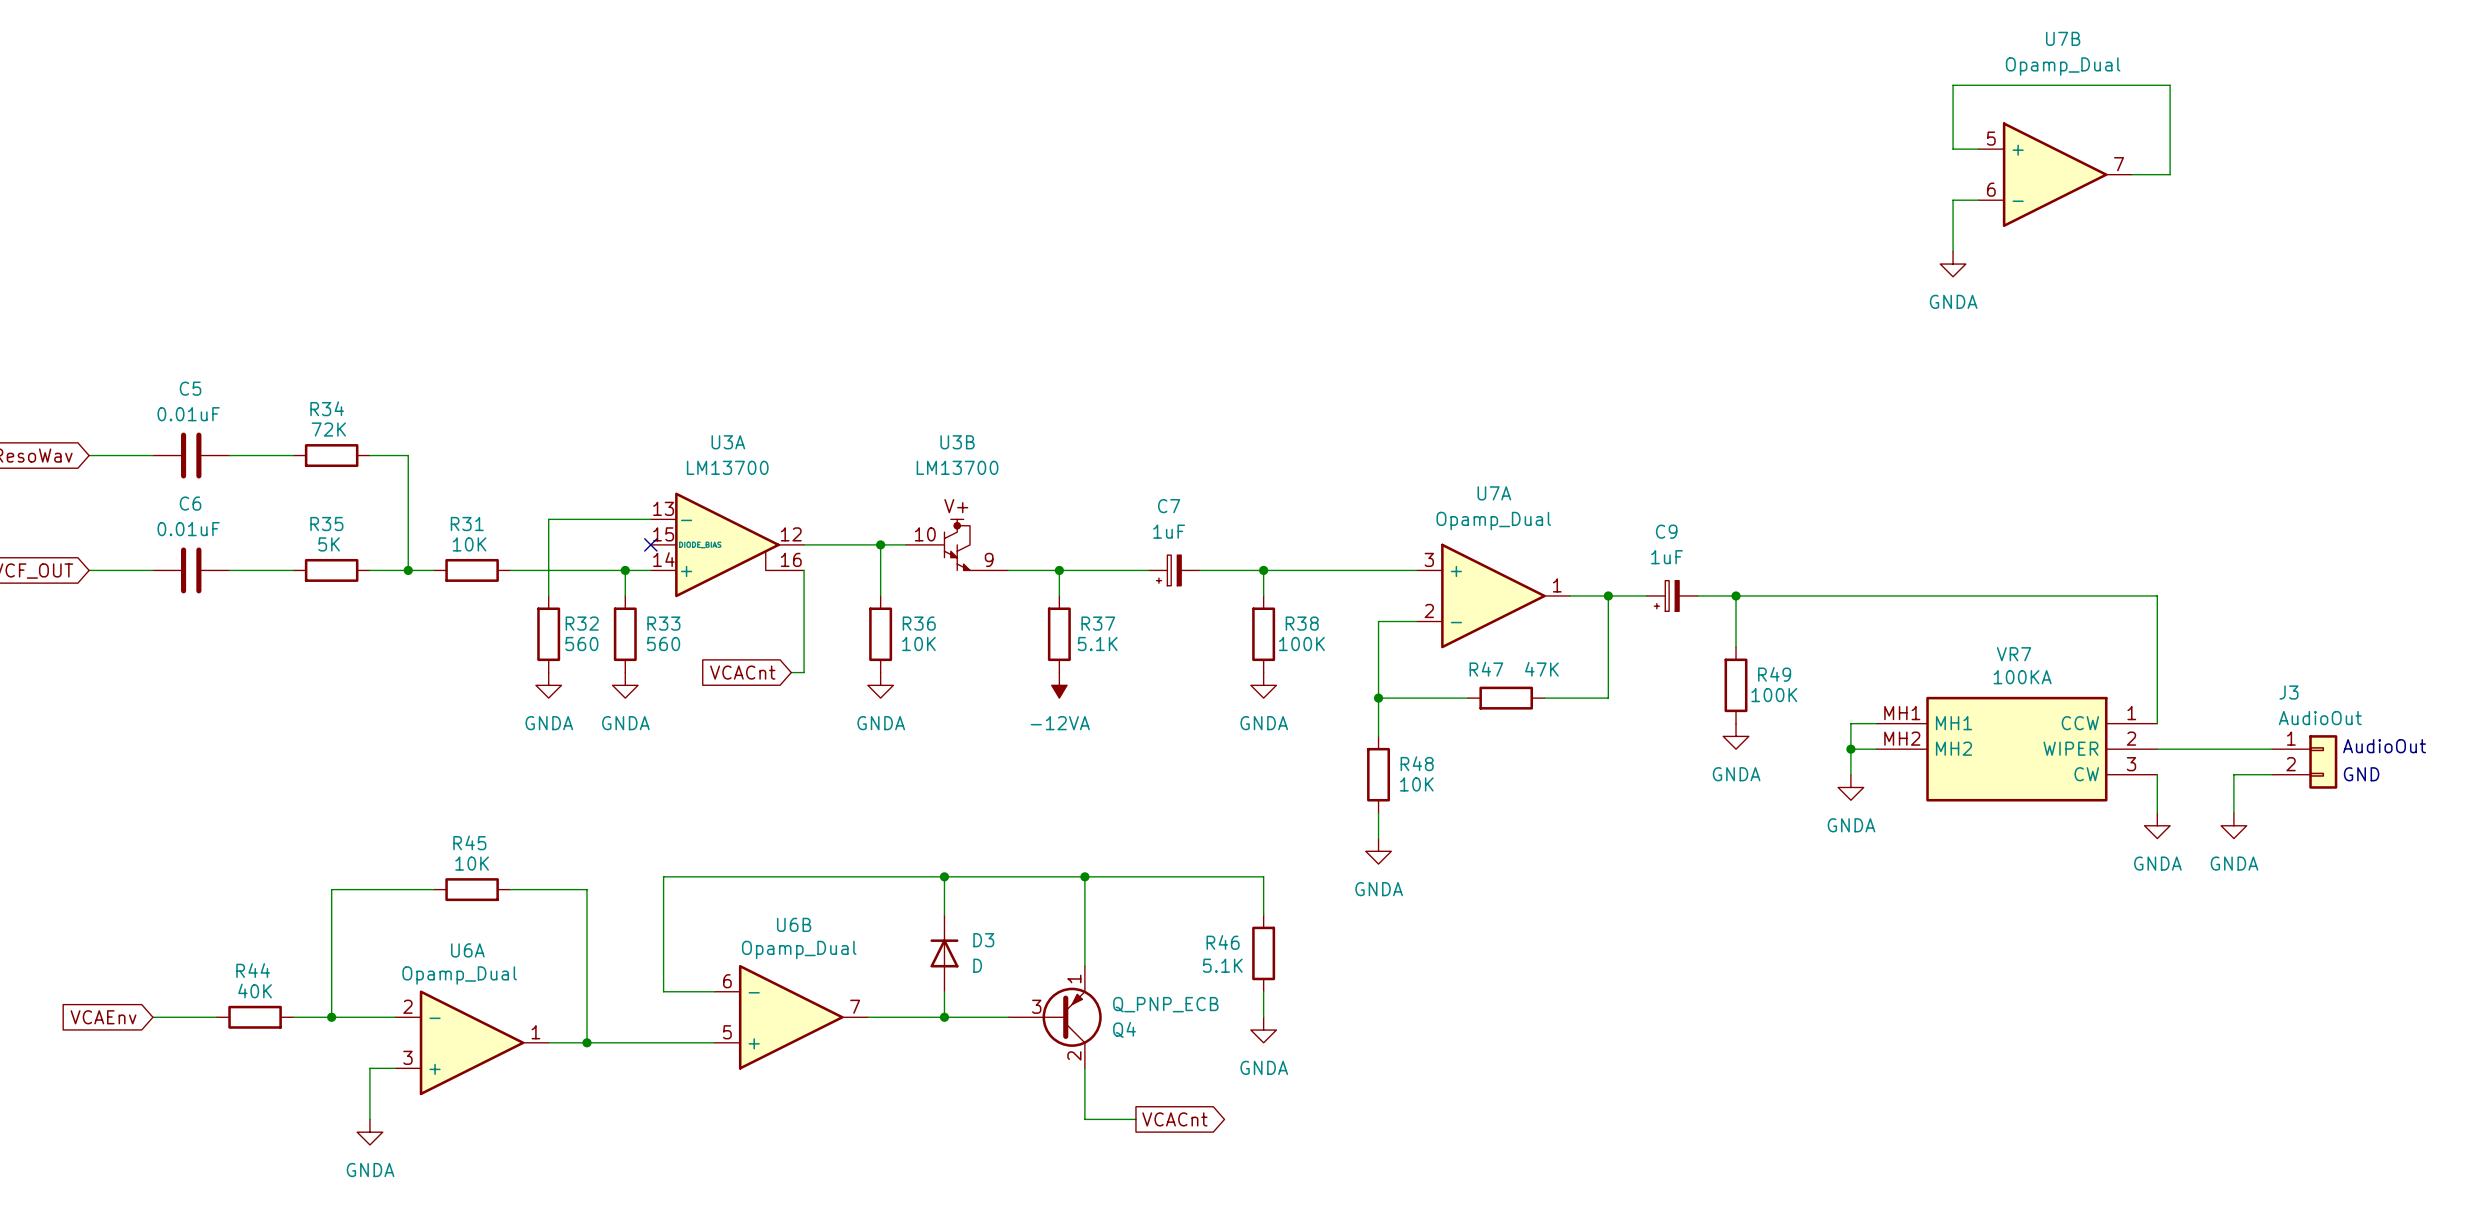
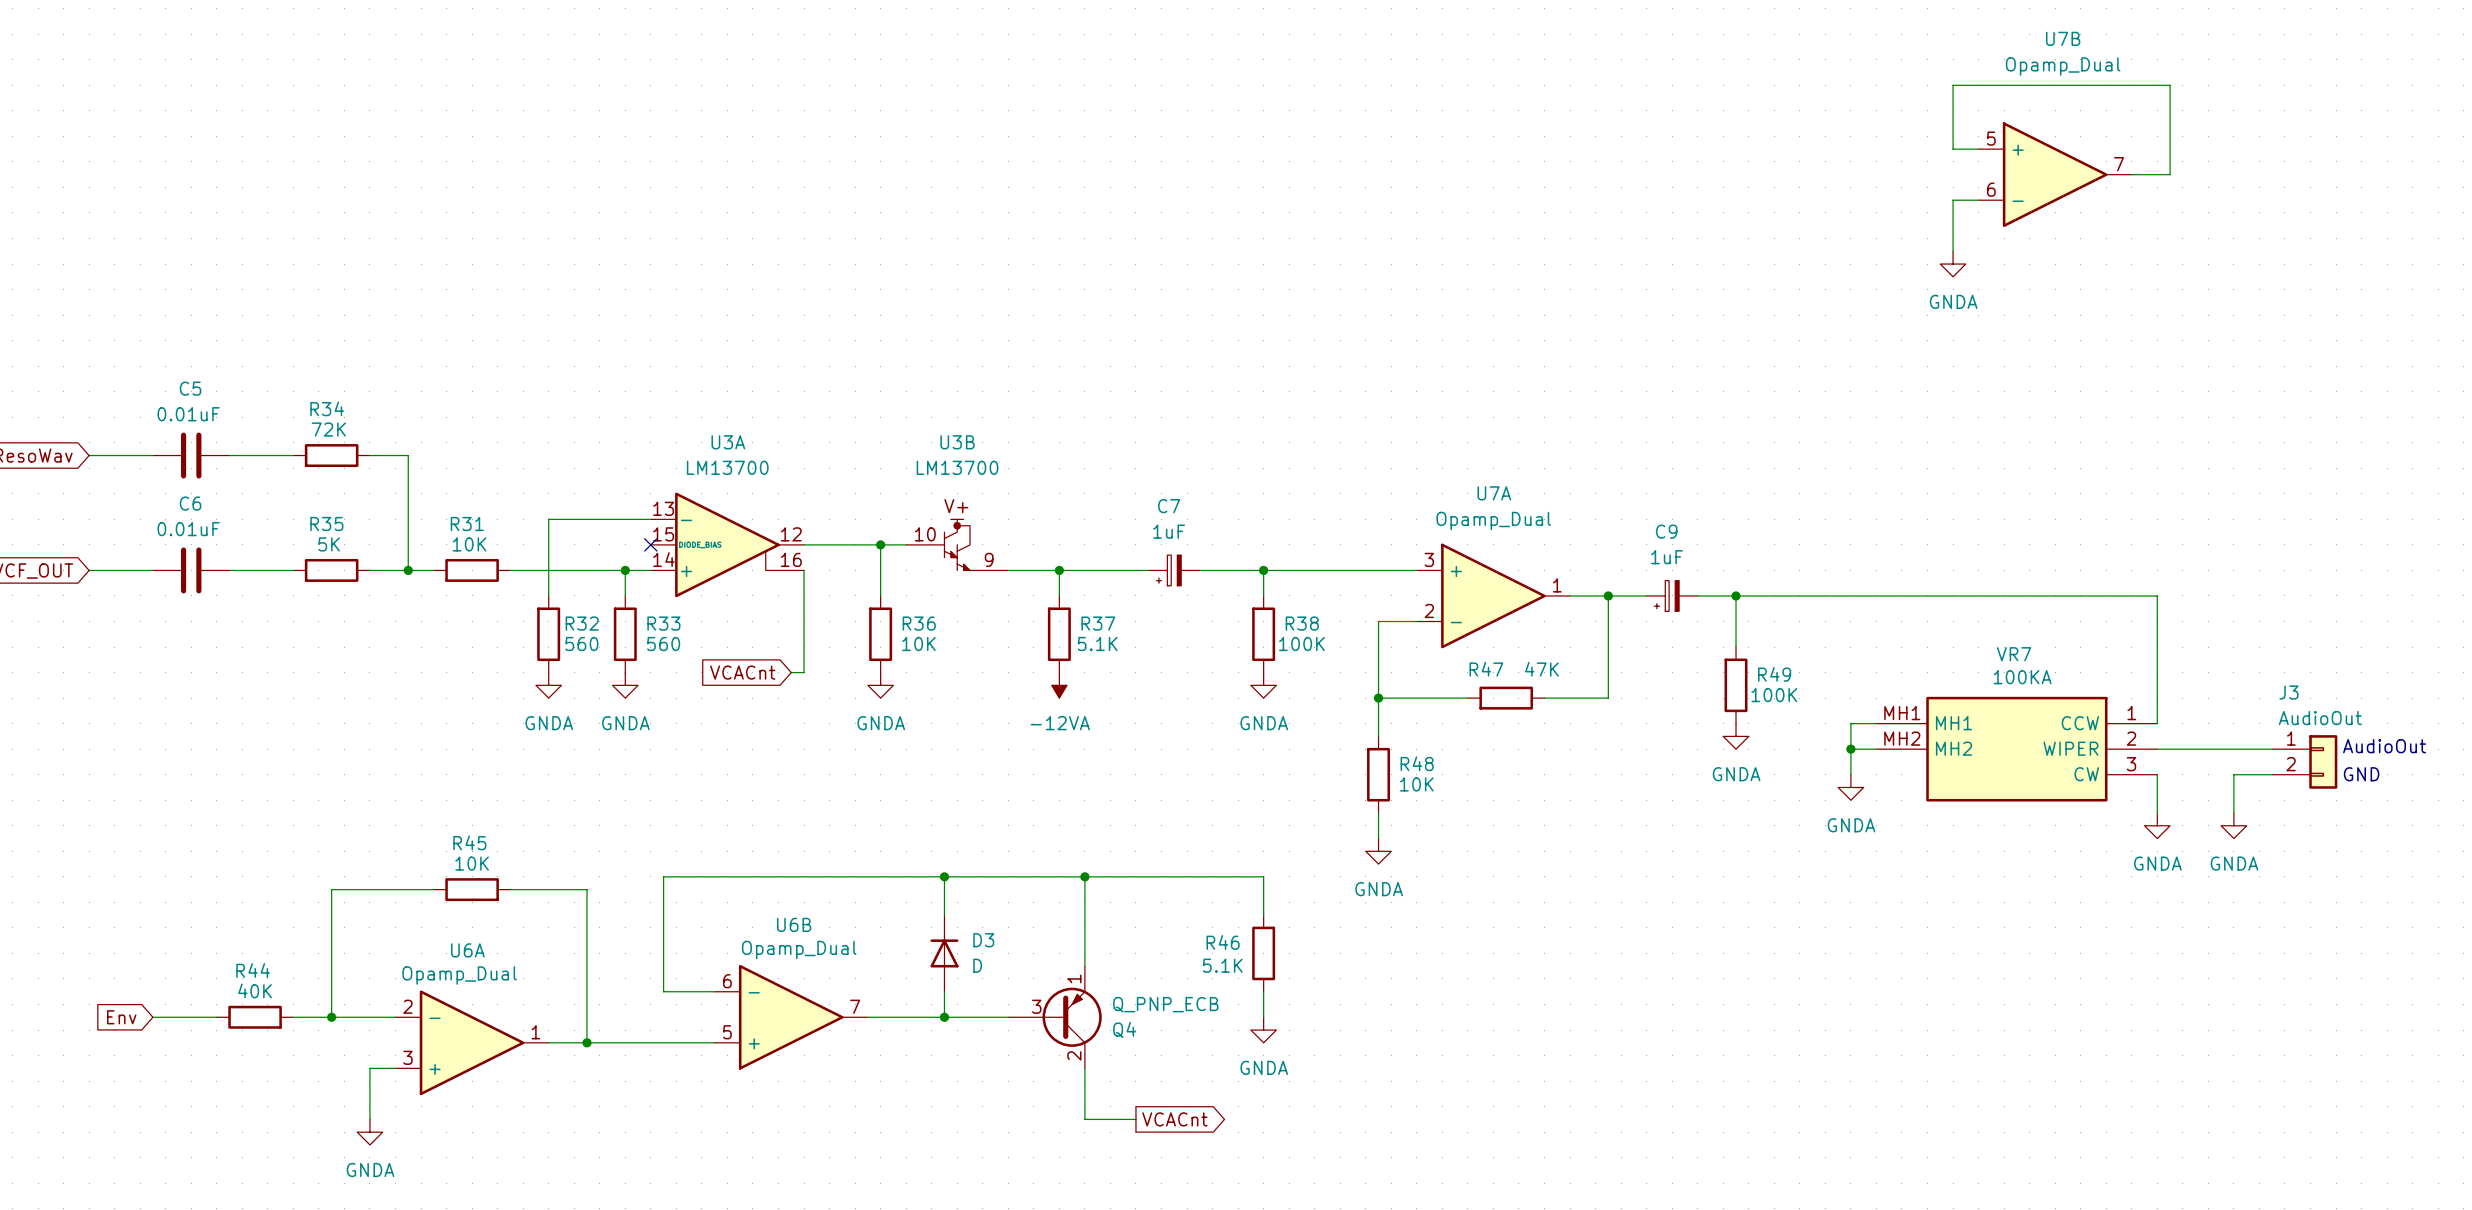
global label: VCAEnv (103, 1017) -> Env (121, 1017)

